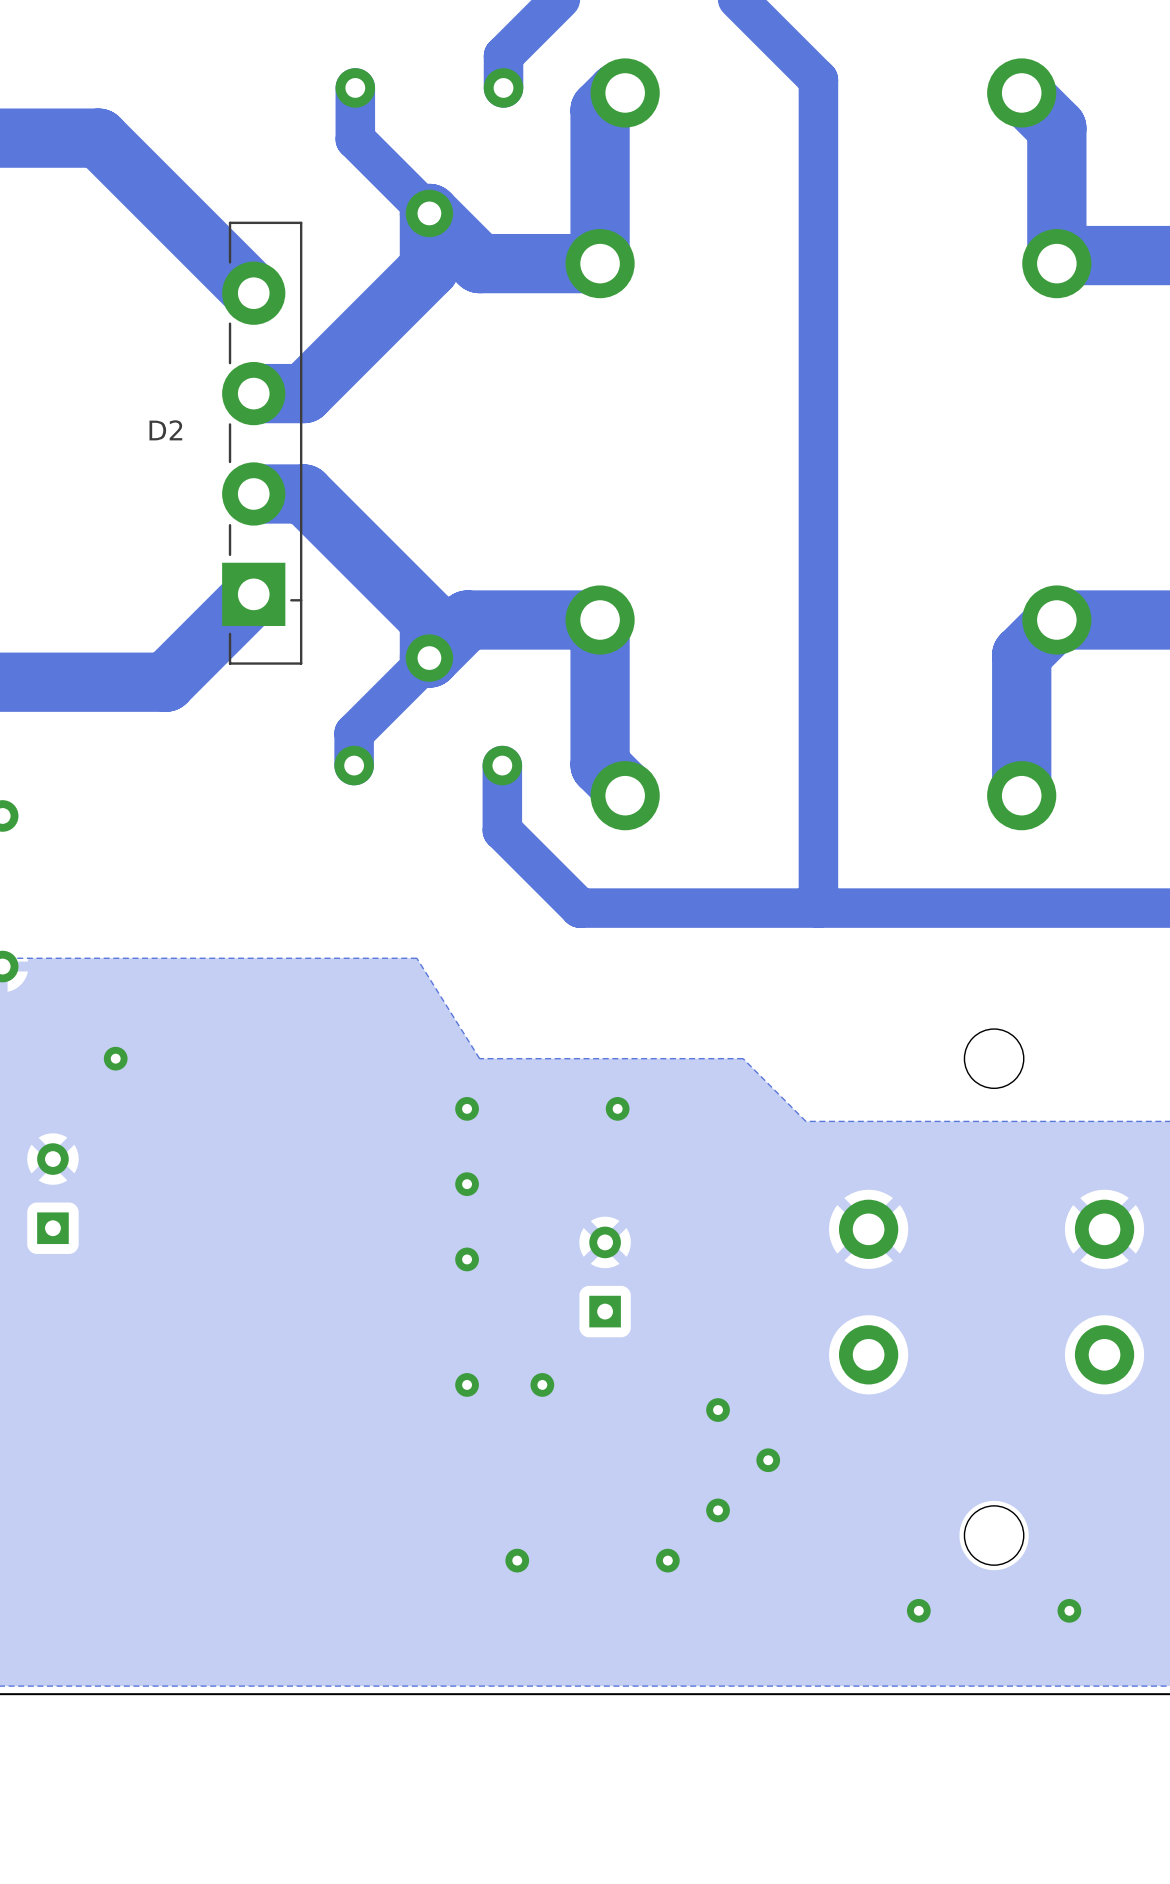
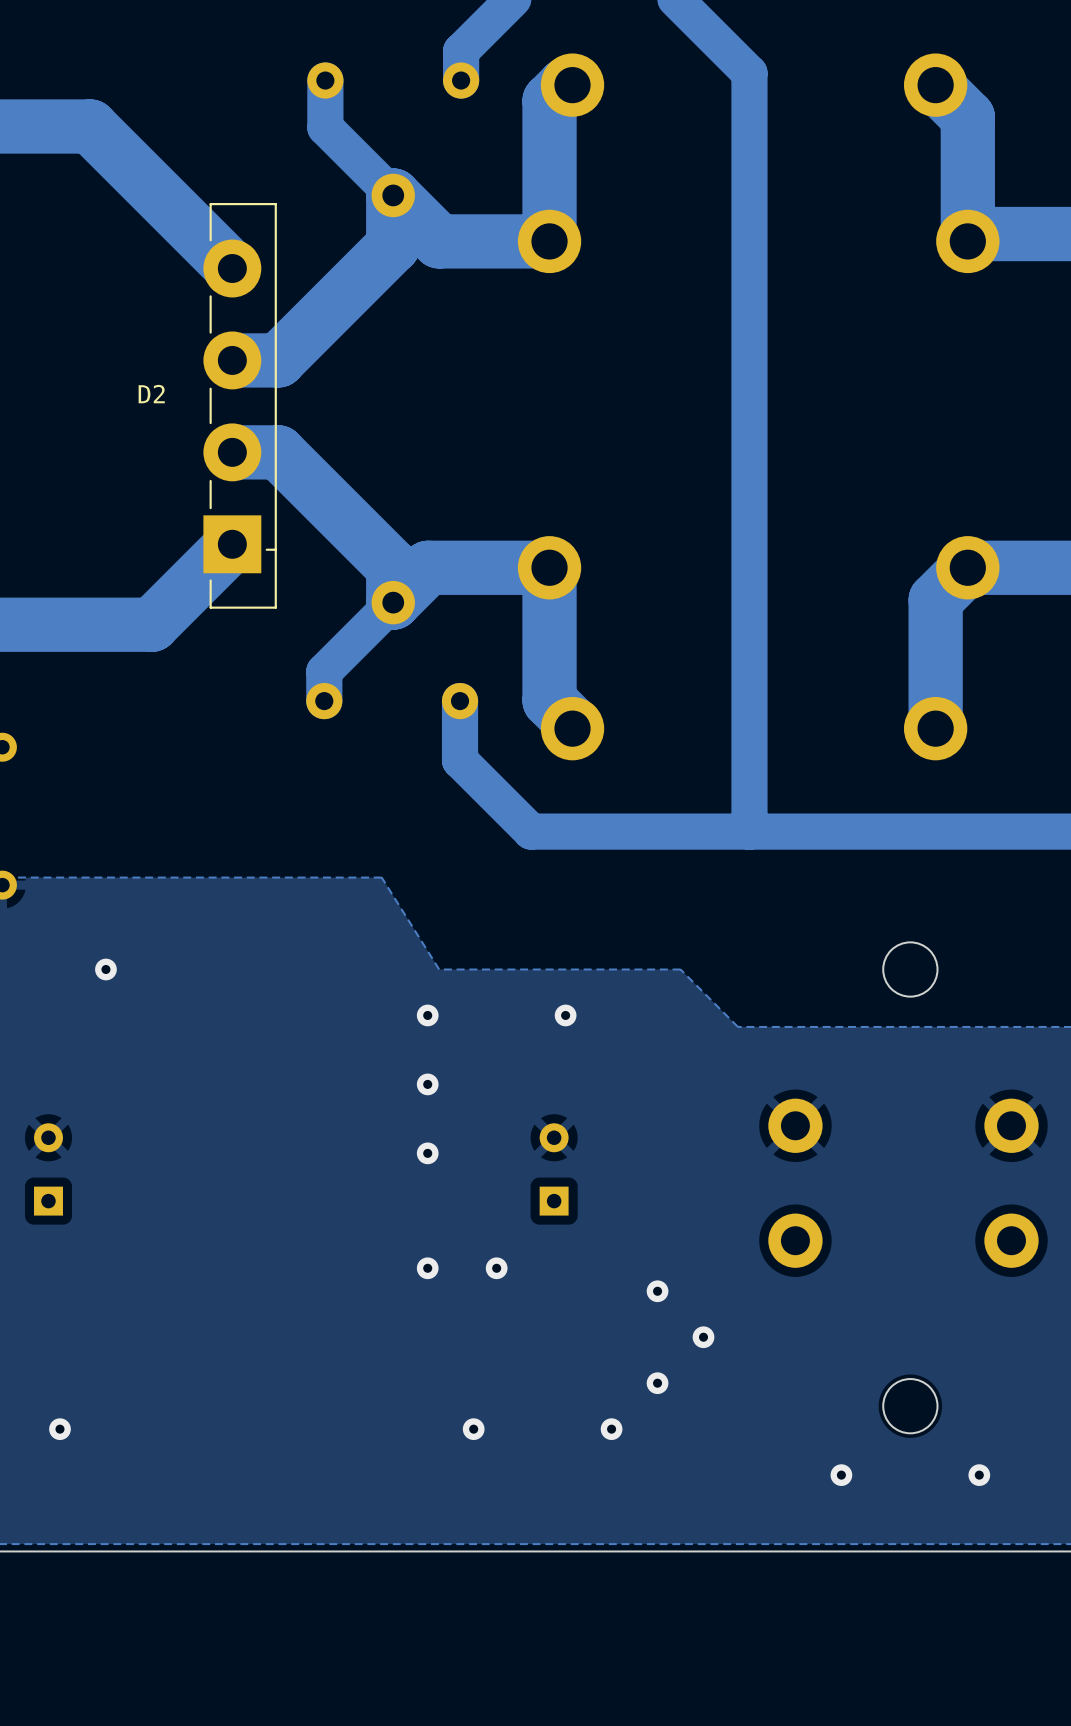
part position: (52, 1193) -> (48, 1169)
via: none -> (59, 1429)

